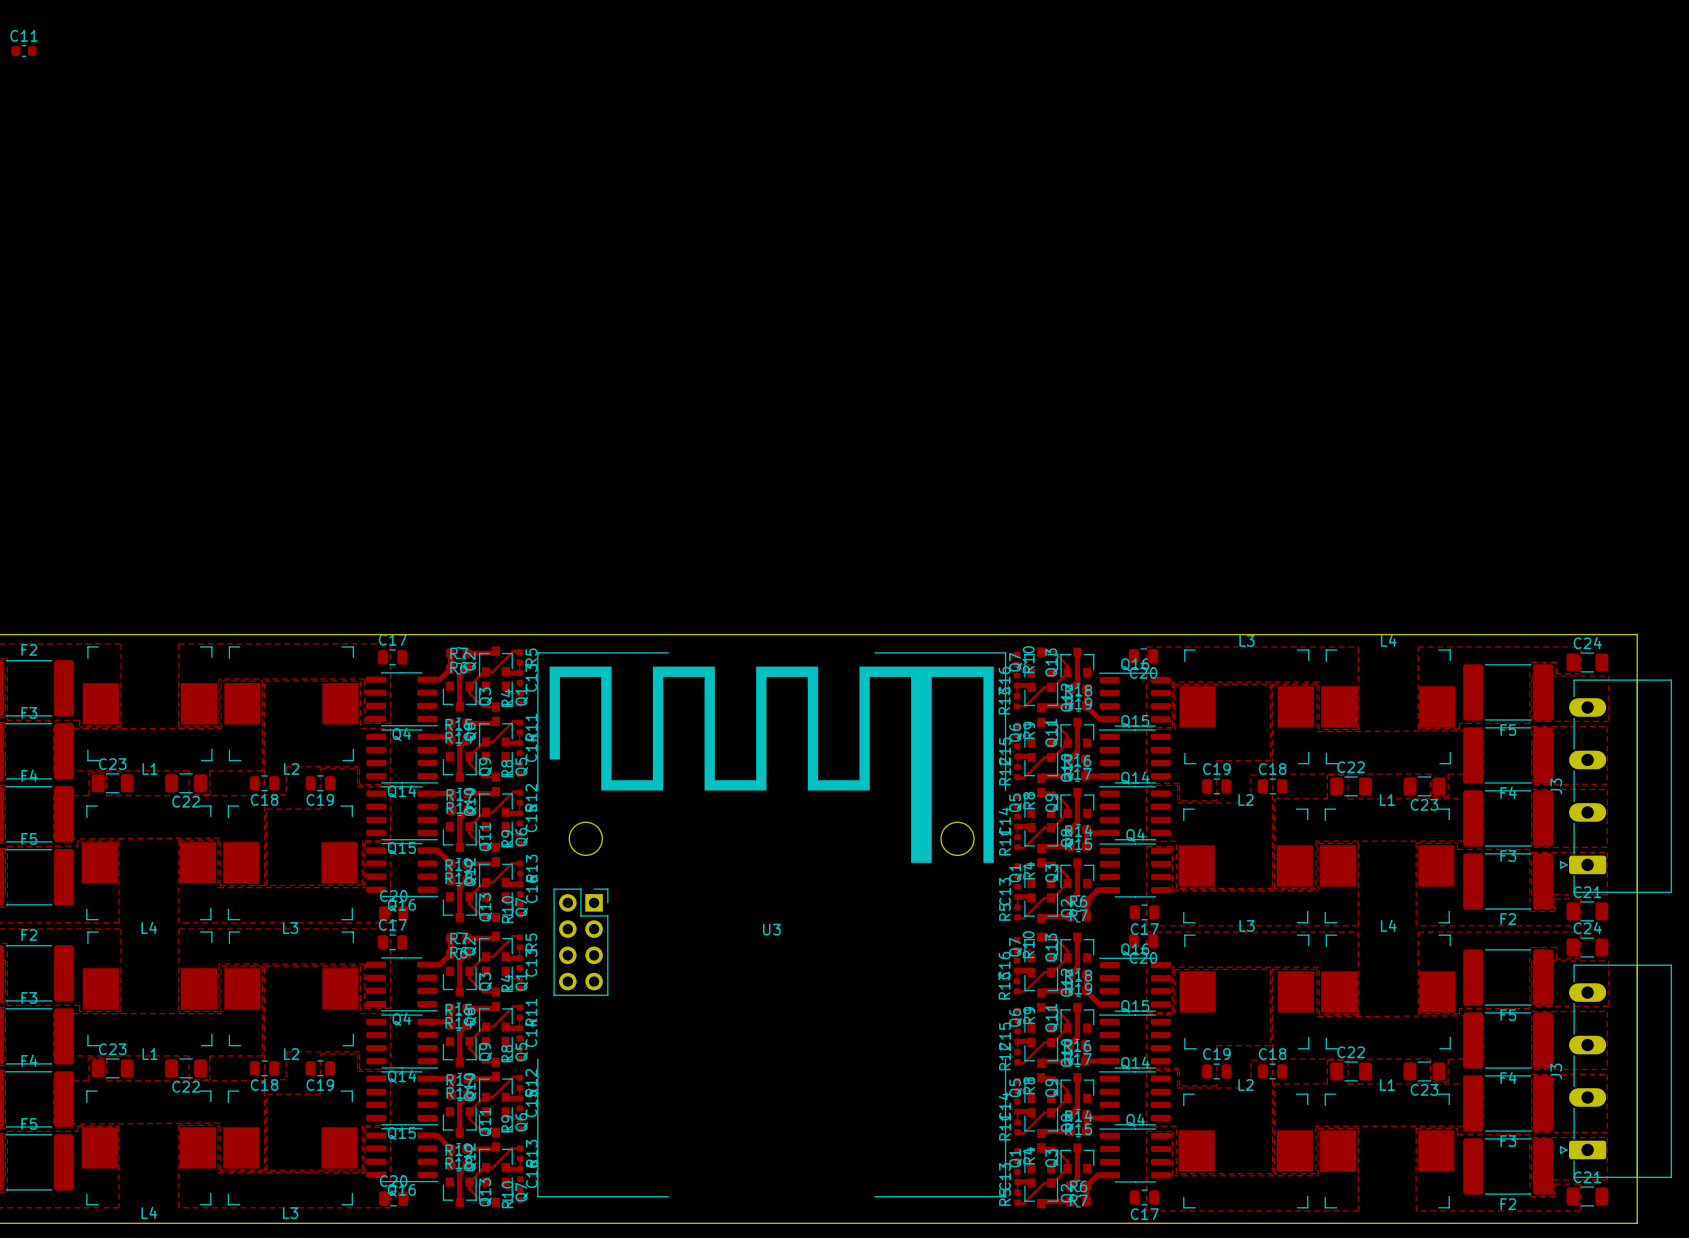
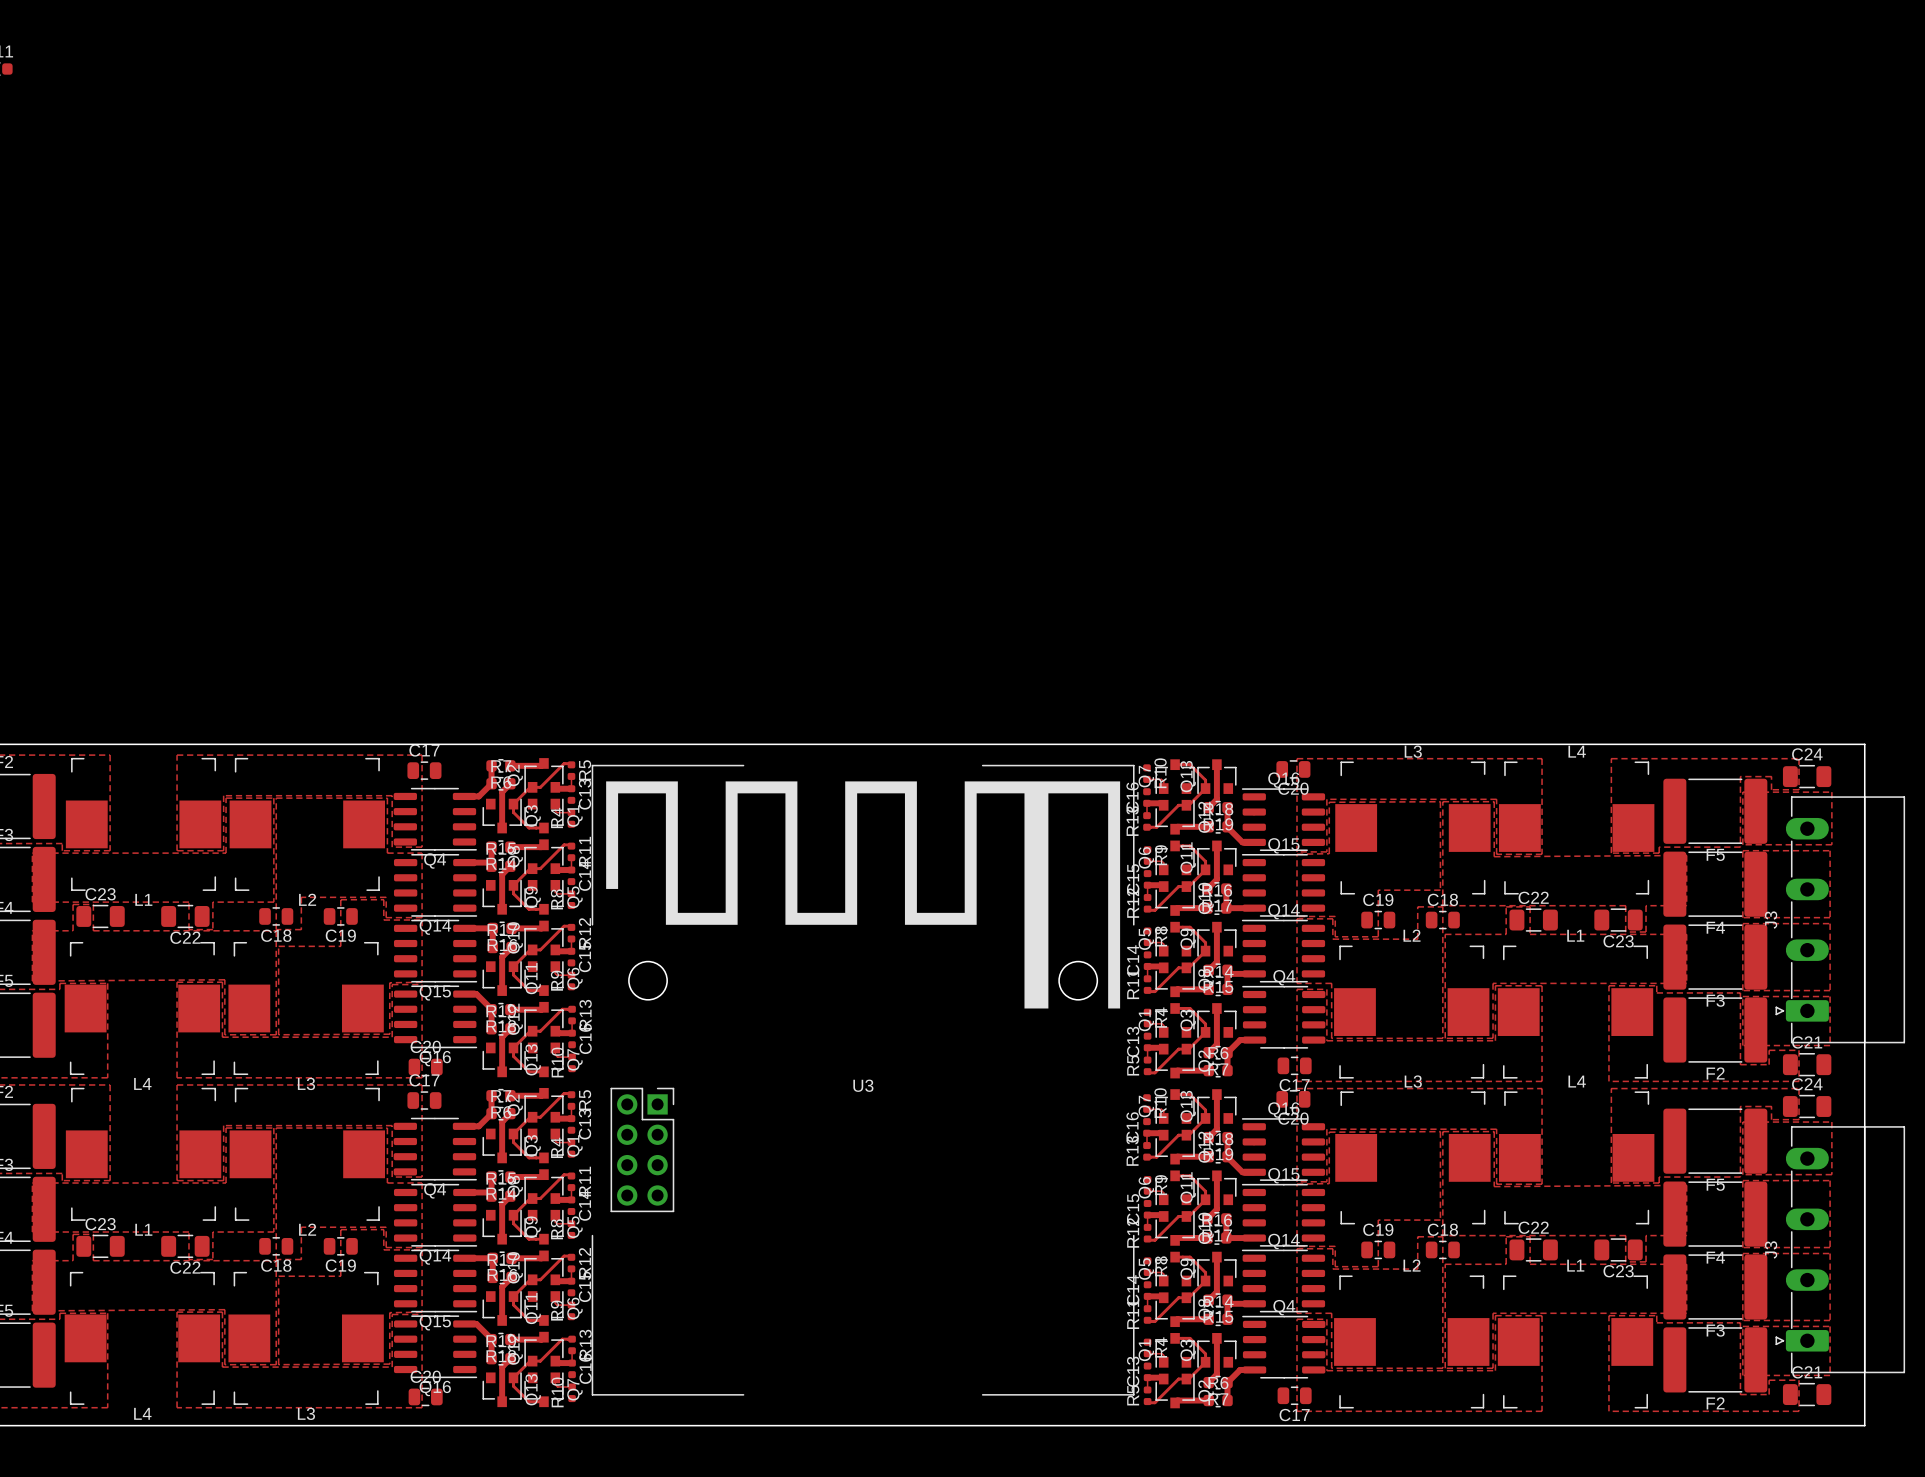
U3 footprint: [537, 652, 1007, 1198] -> [591, 764, 1135, 1396]

